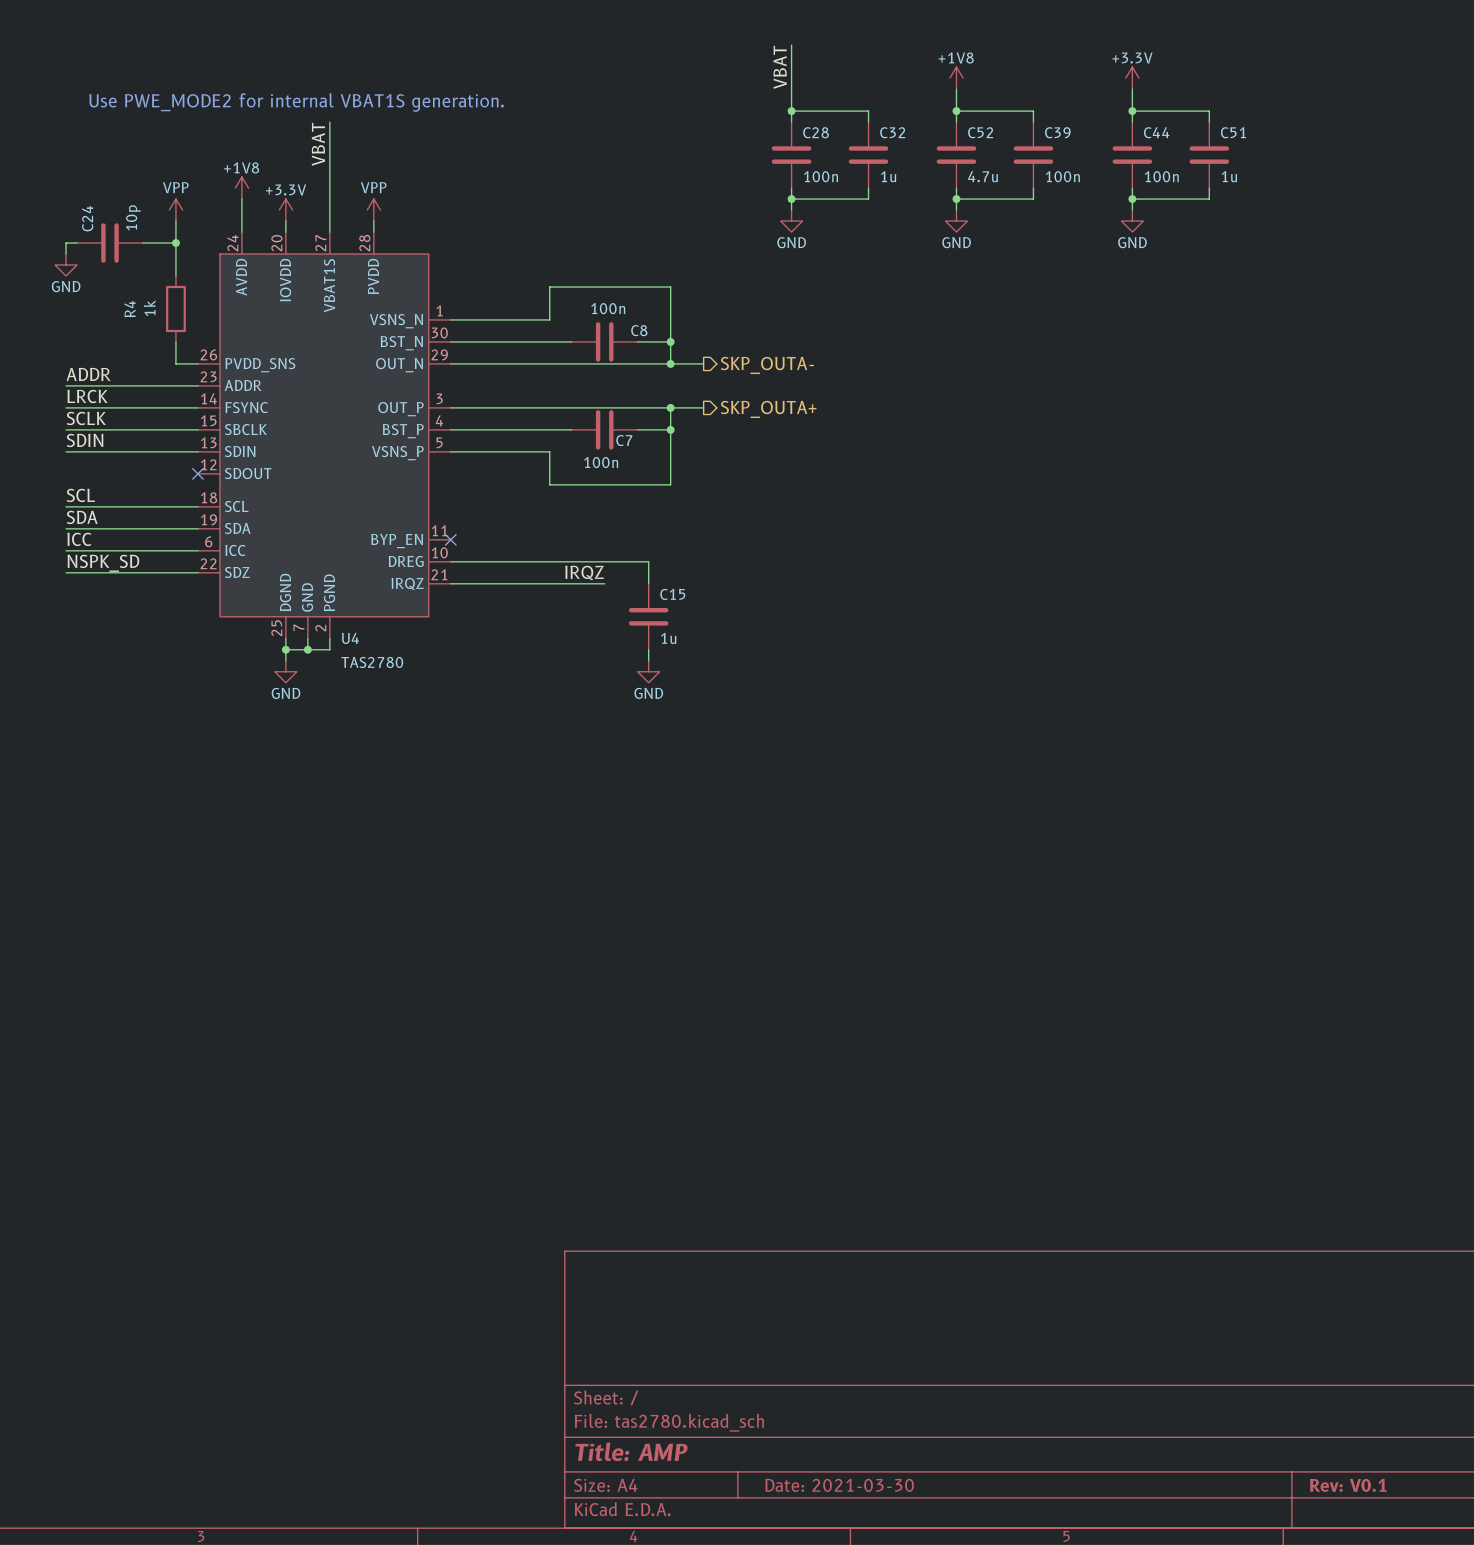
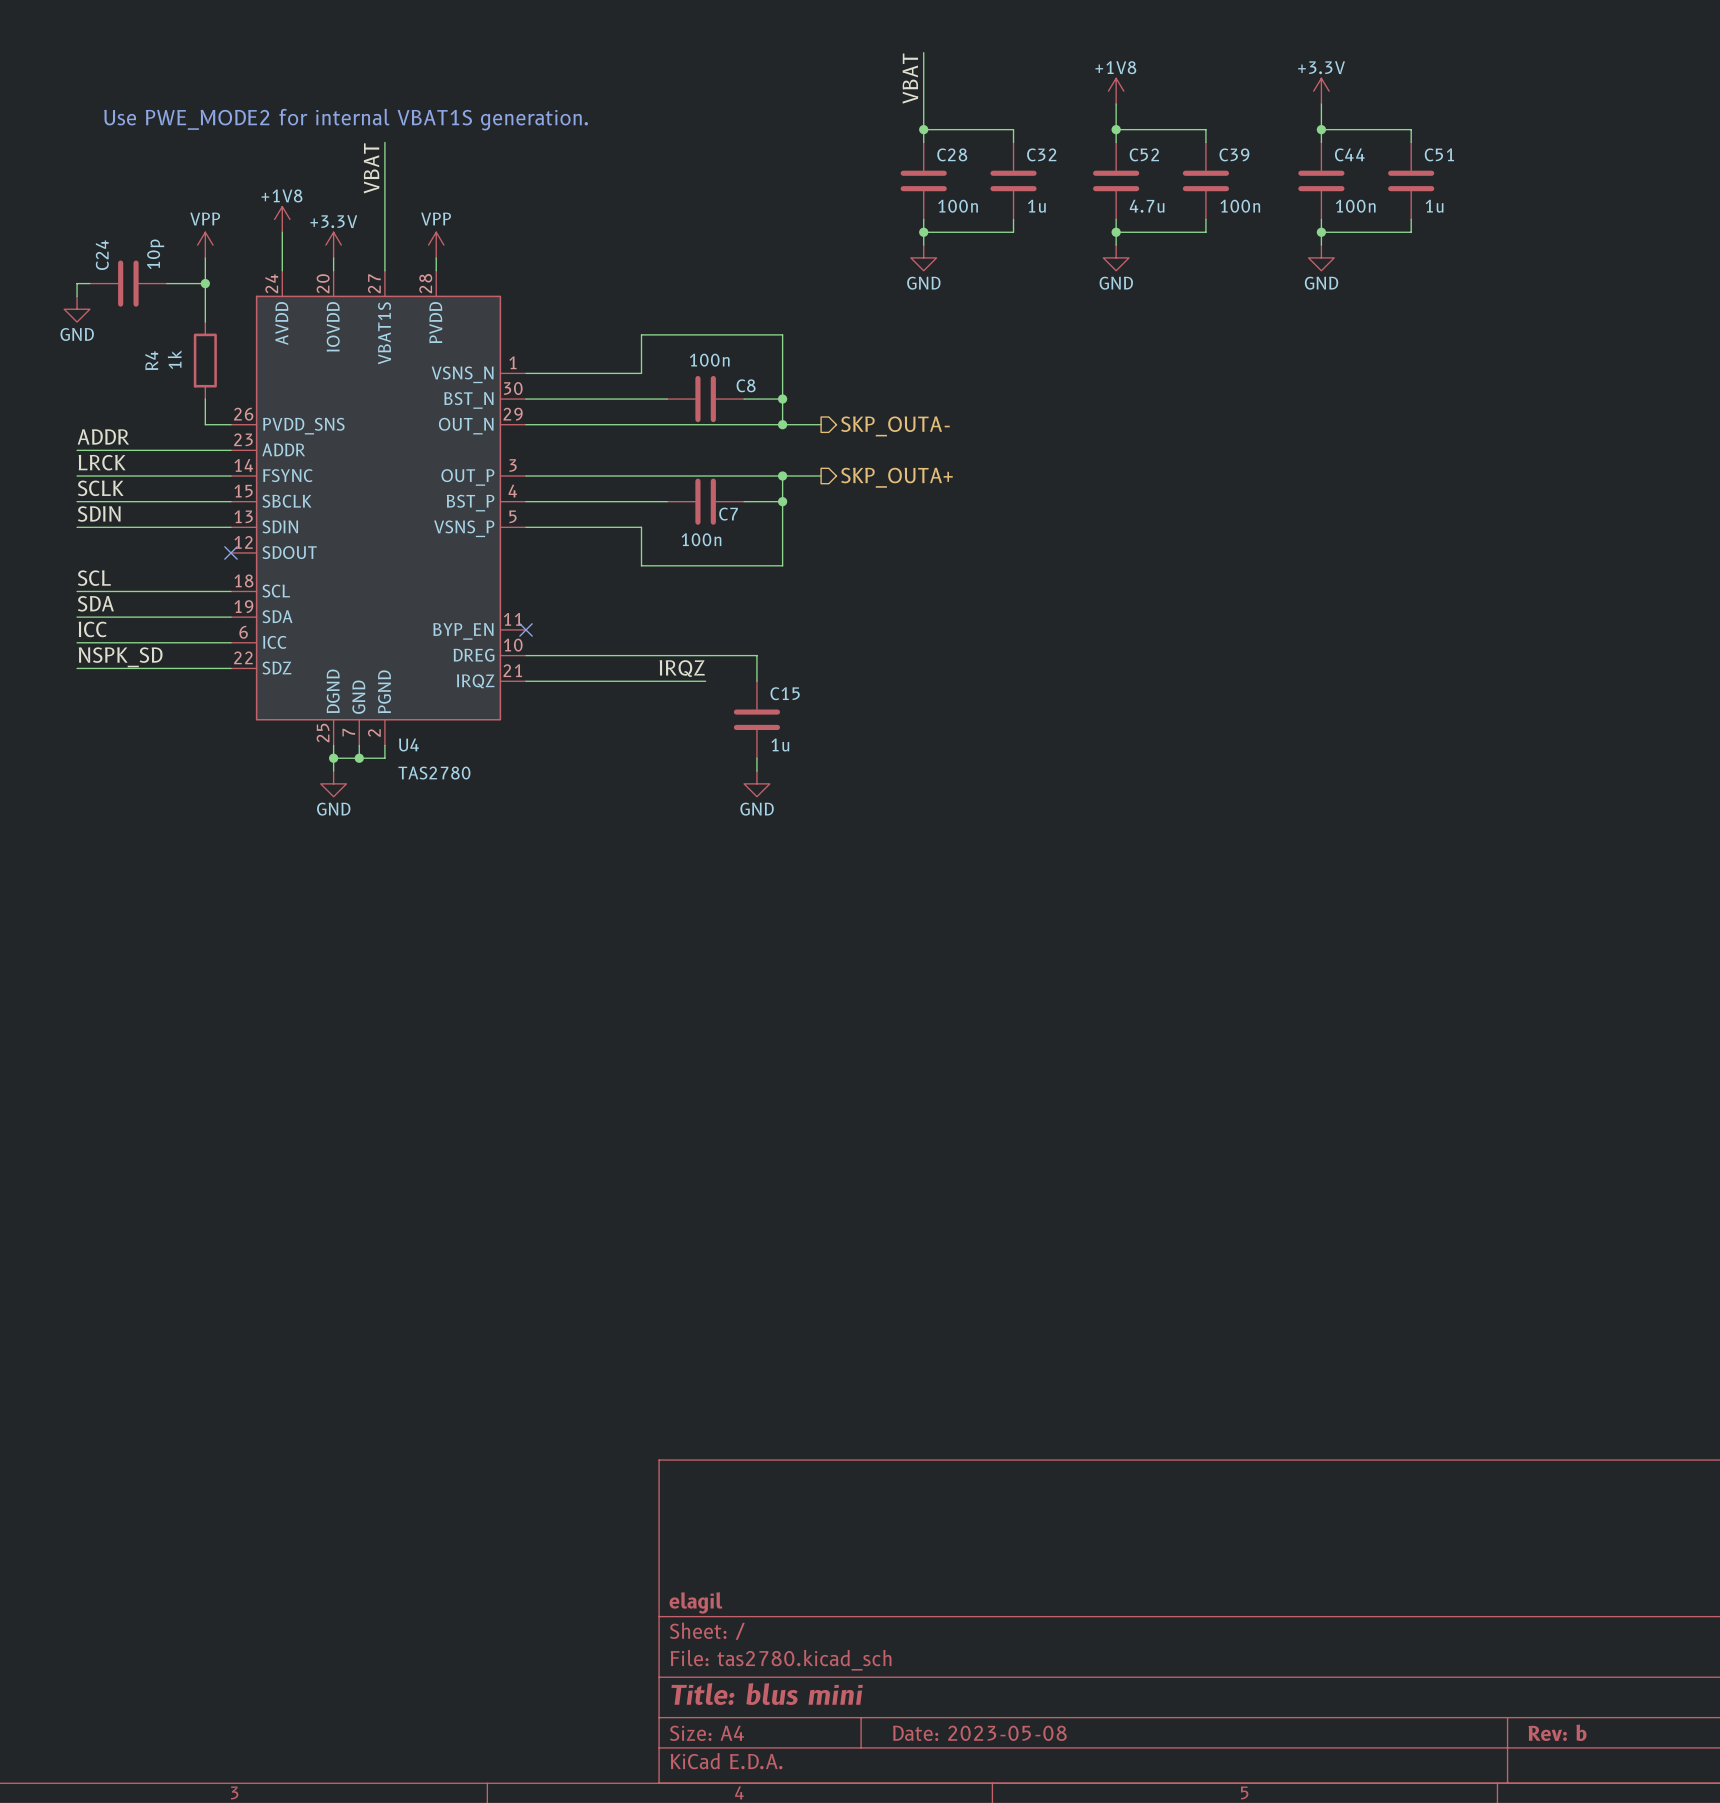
title block: none -> elagil (695, 1602)
title block: Title: AMP (631, 1451) -> Title: blus mini (767, 1694)
title block: Date: 2021-03-30 (839, 1485) -> Date: 2023-05-08 (979, 1733)
title block: Rev: V0.1 (1348, 1485) -> Rev: b (1557, 1732)

